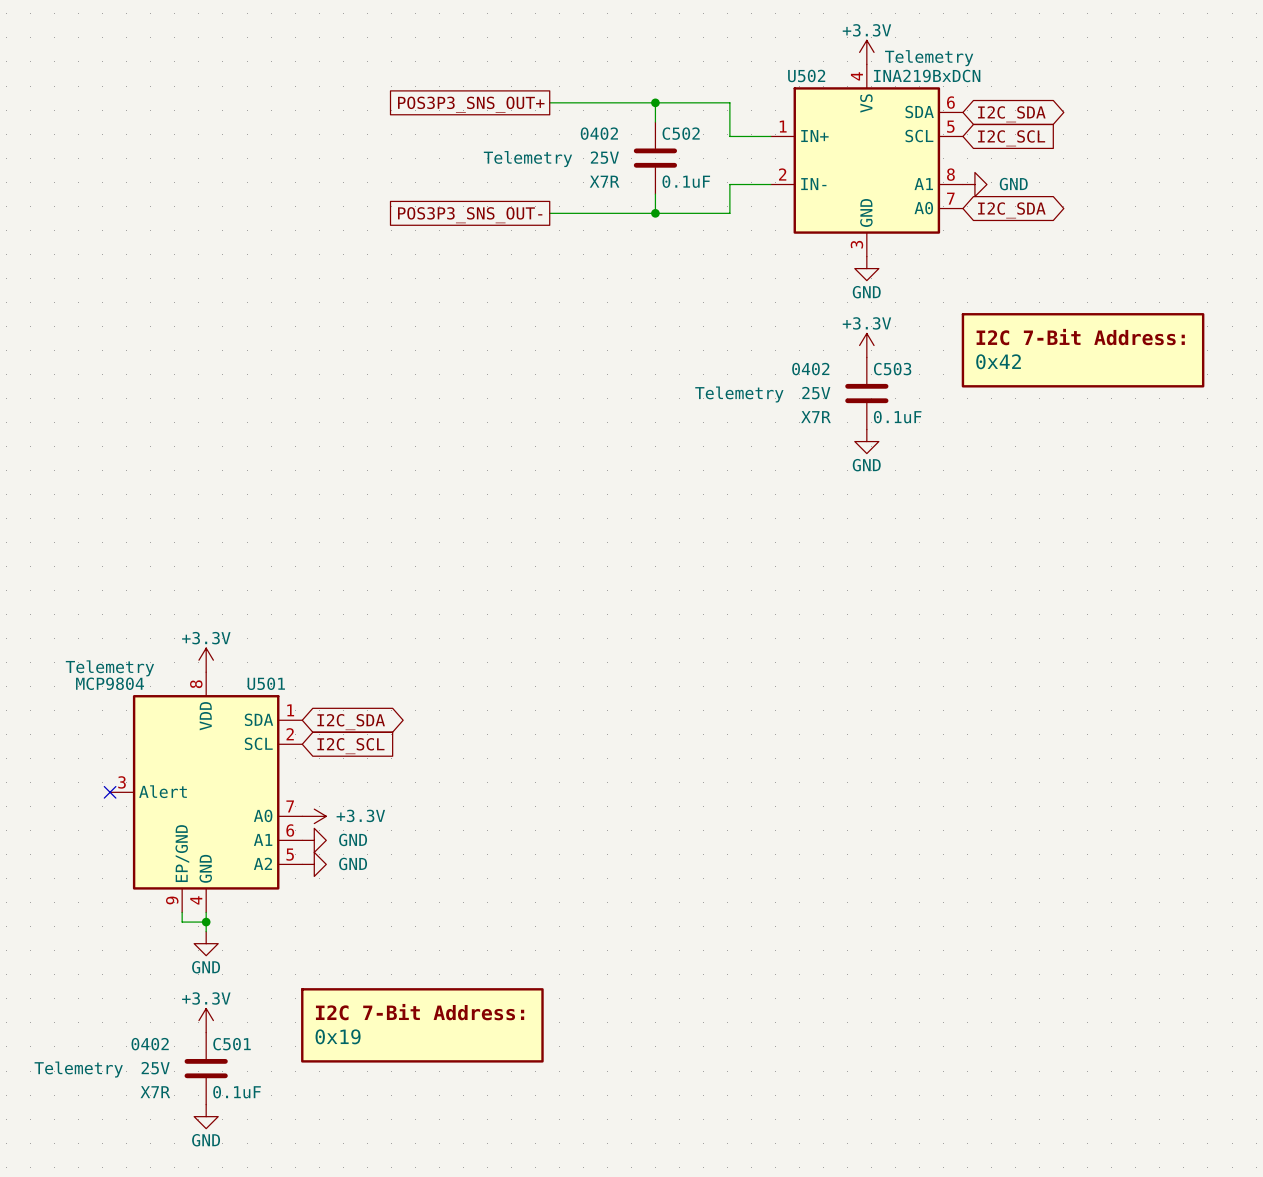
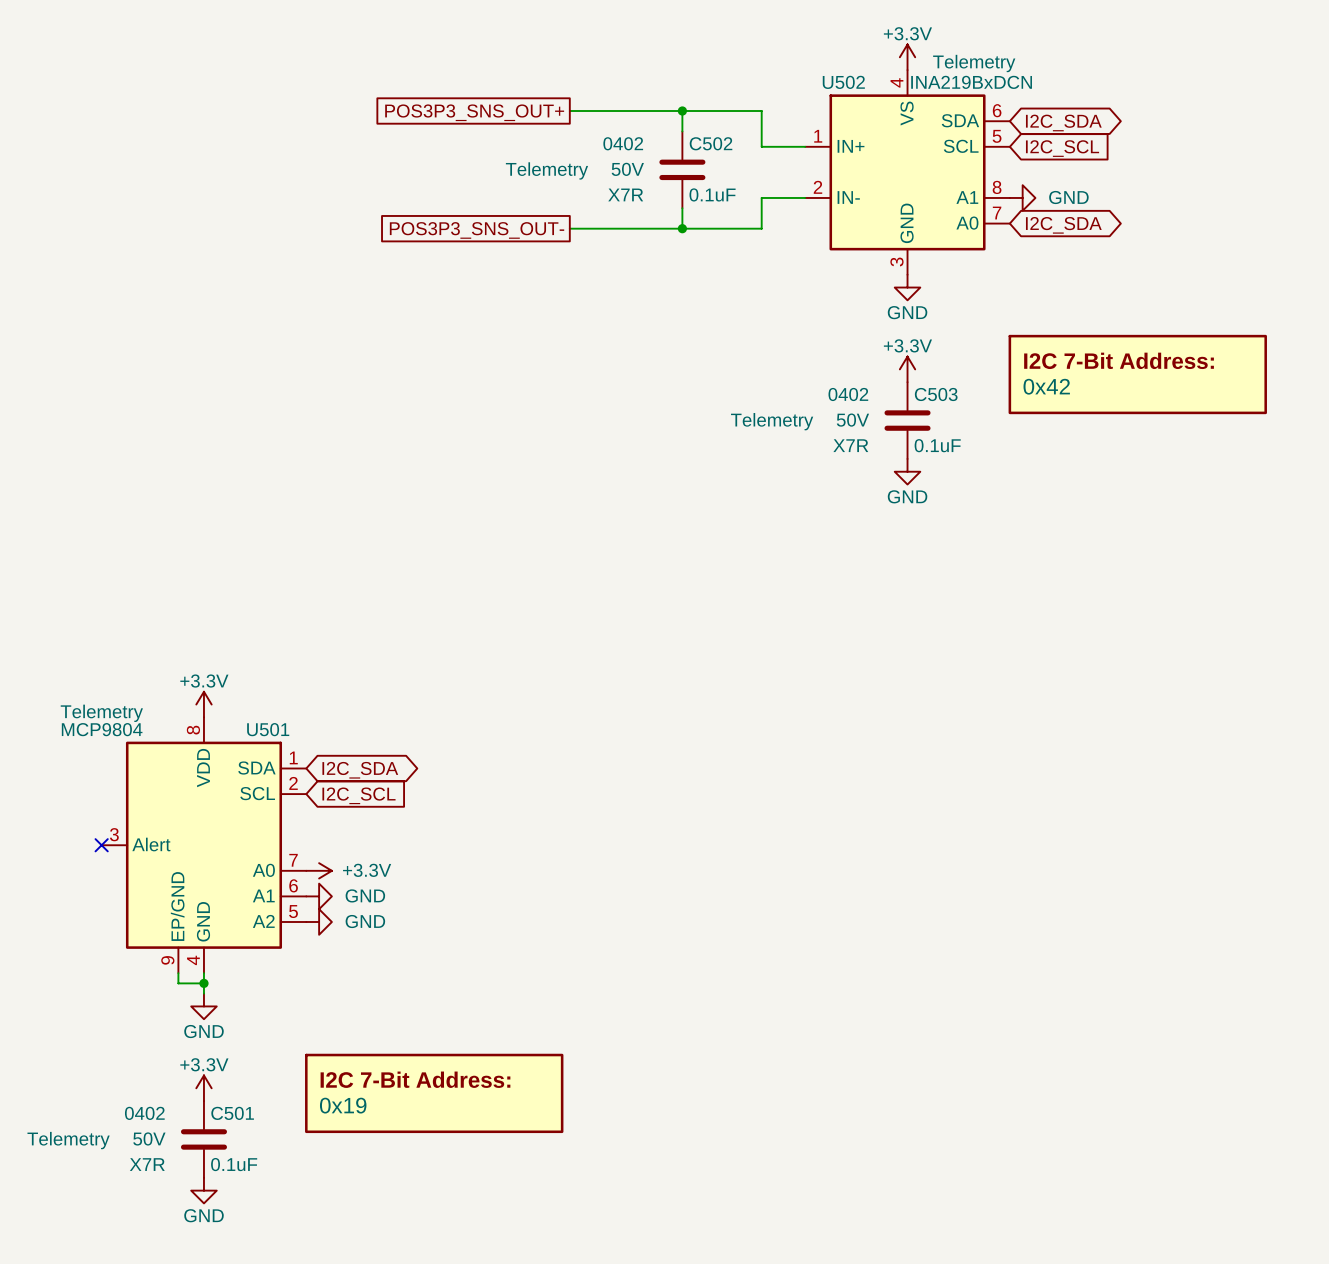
C502 text: 25V (604, 157) -> 50V (627, 169)
C503 text: 25V (816, 393) -> 50V (852, 420)
C501 text: 25V (155, 1068) -> 50V (149, 1138)

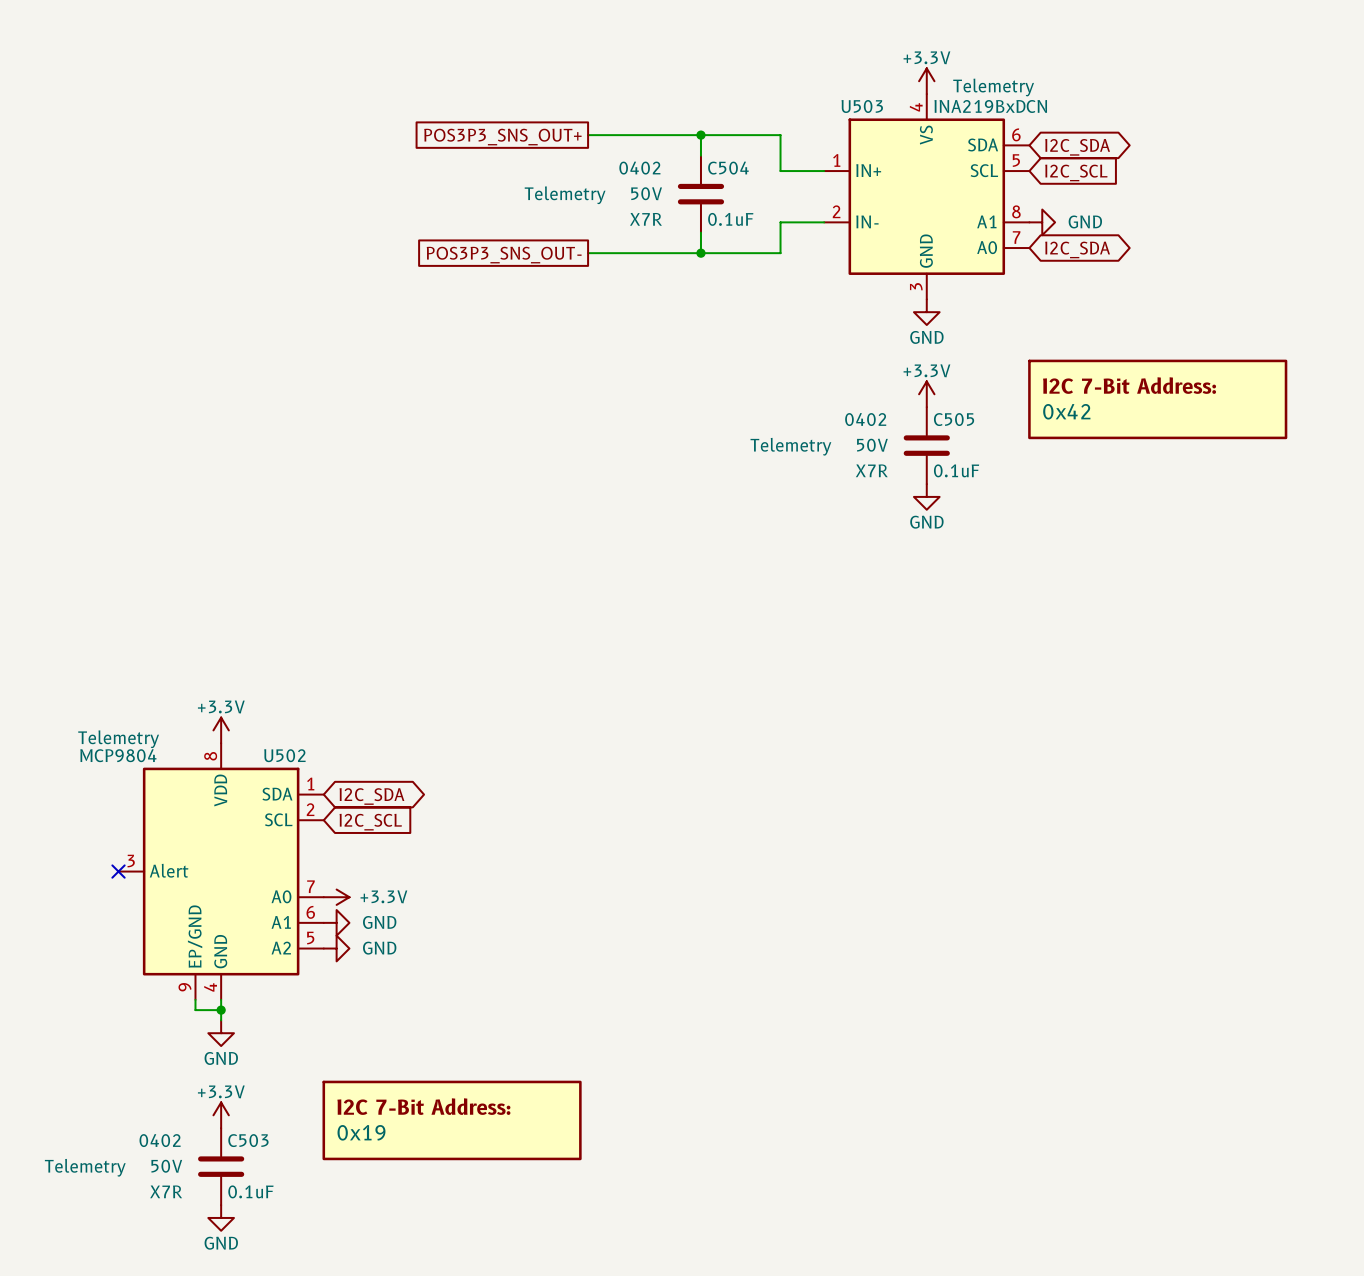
U502 name: U502 (843, 82) -> U503 (862, 106)
C502 name: C502 (711, 143) -> C504 (728, 168)
C503 name: C503 (936, 394) -> C505 (954, 419)
U501 name: U501 (268, 729) -> U502 (284, 755)
C501 name: C501 (232, 1113) -> C503 (248, 1140)

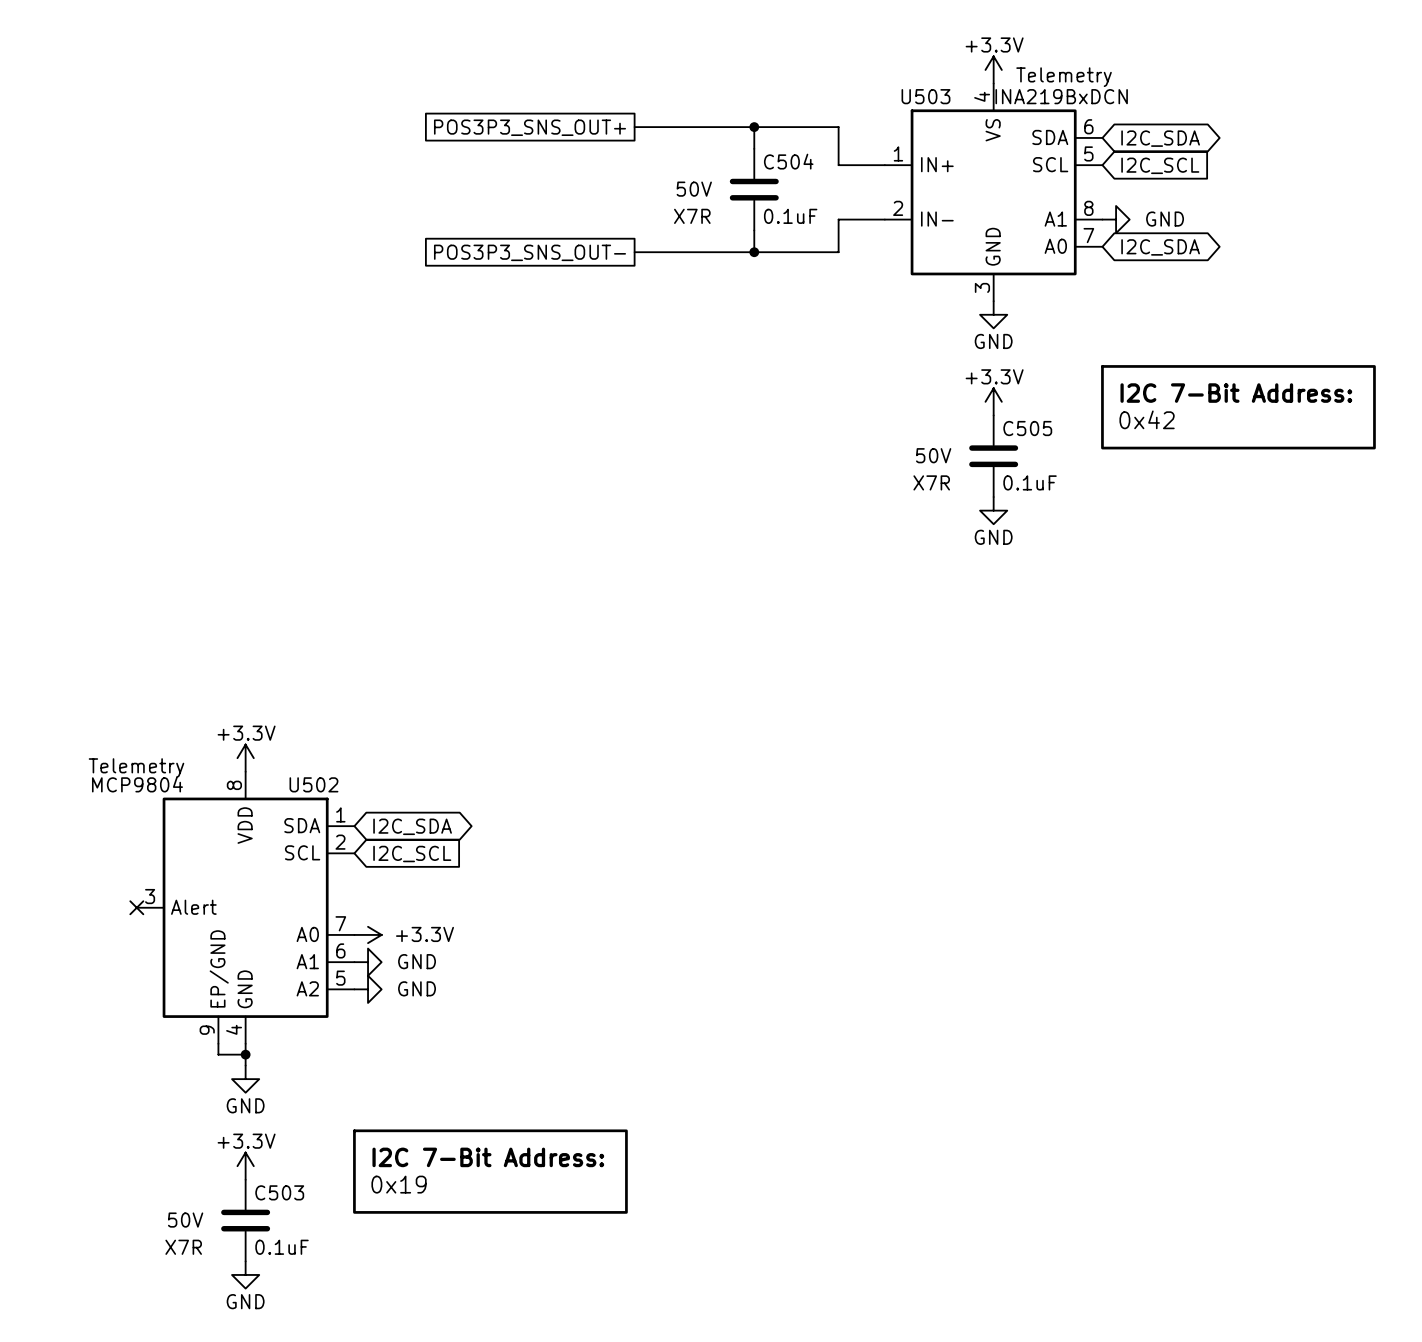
C504 text: 0402 (639, 168) -> none
C504 text: Telemetry (565, 195) -> none
C505 text: 0402 (865, 419) -> none
C505 text: Telemetry (790, 446) -> none
C503 text: 0402 (160, 1140) -> none
C503 text: Telemetry (85, 1167) -> none

